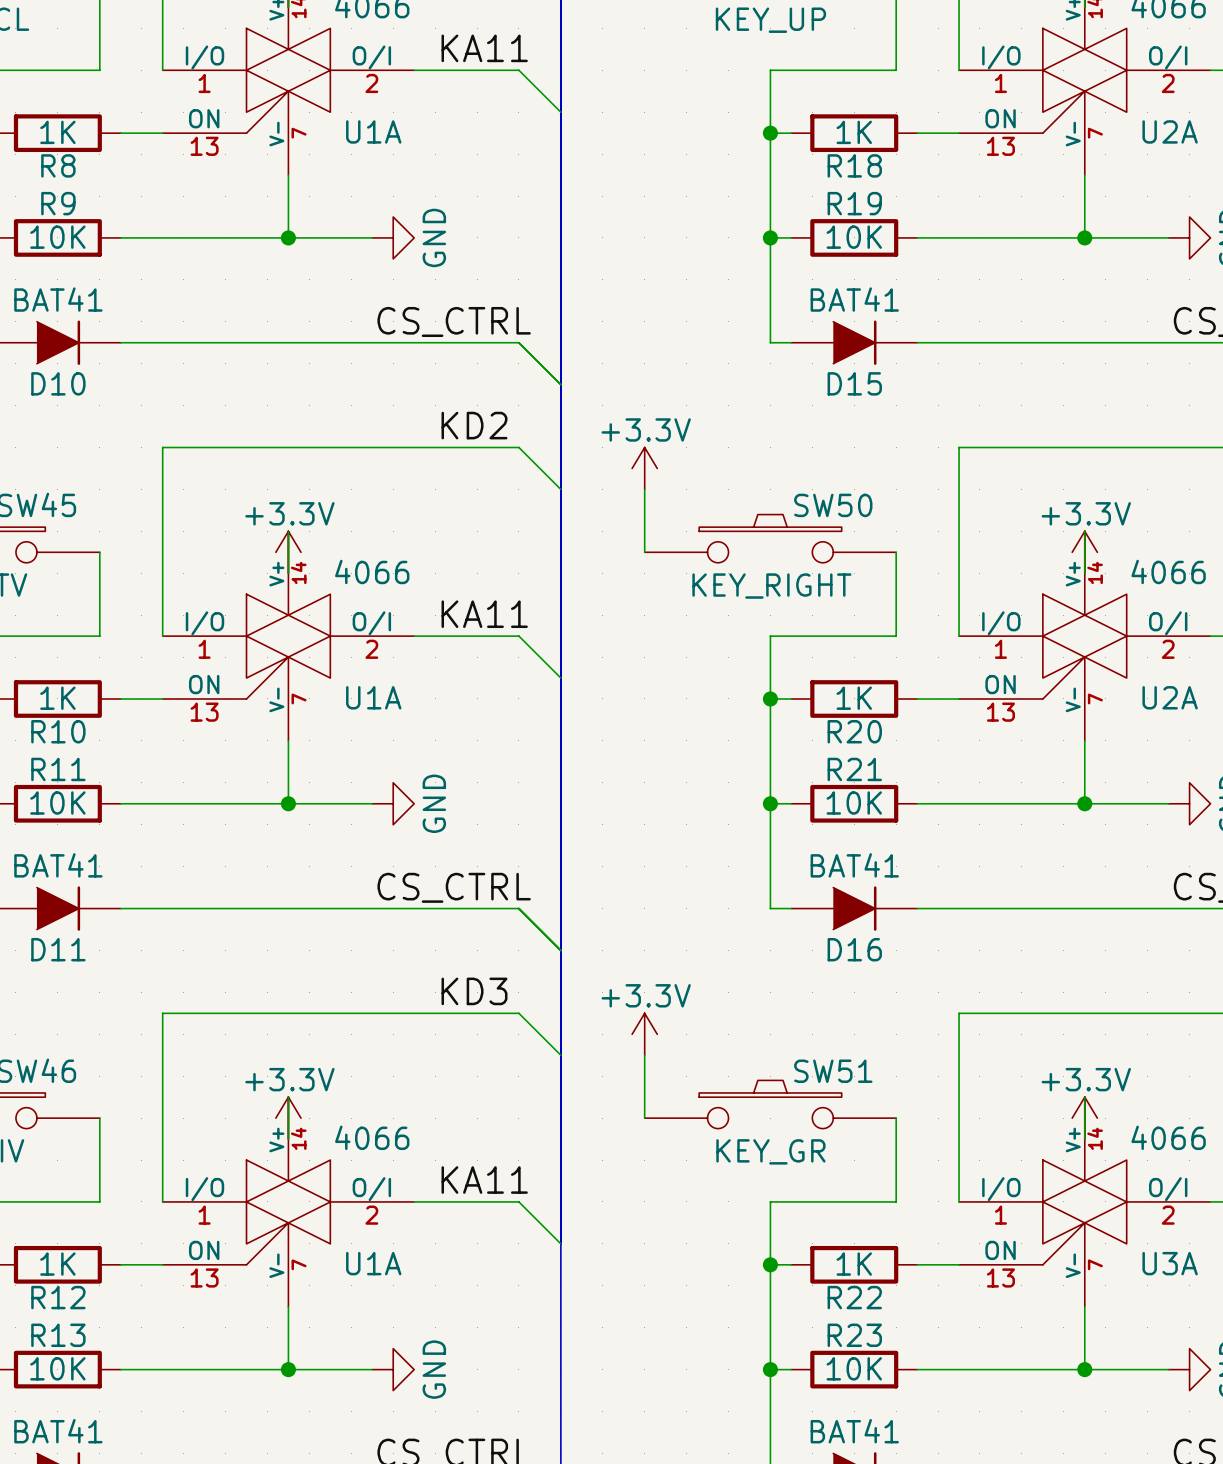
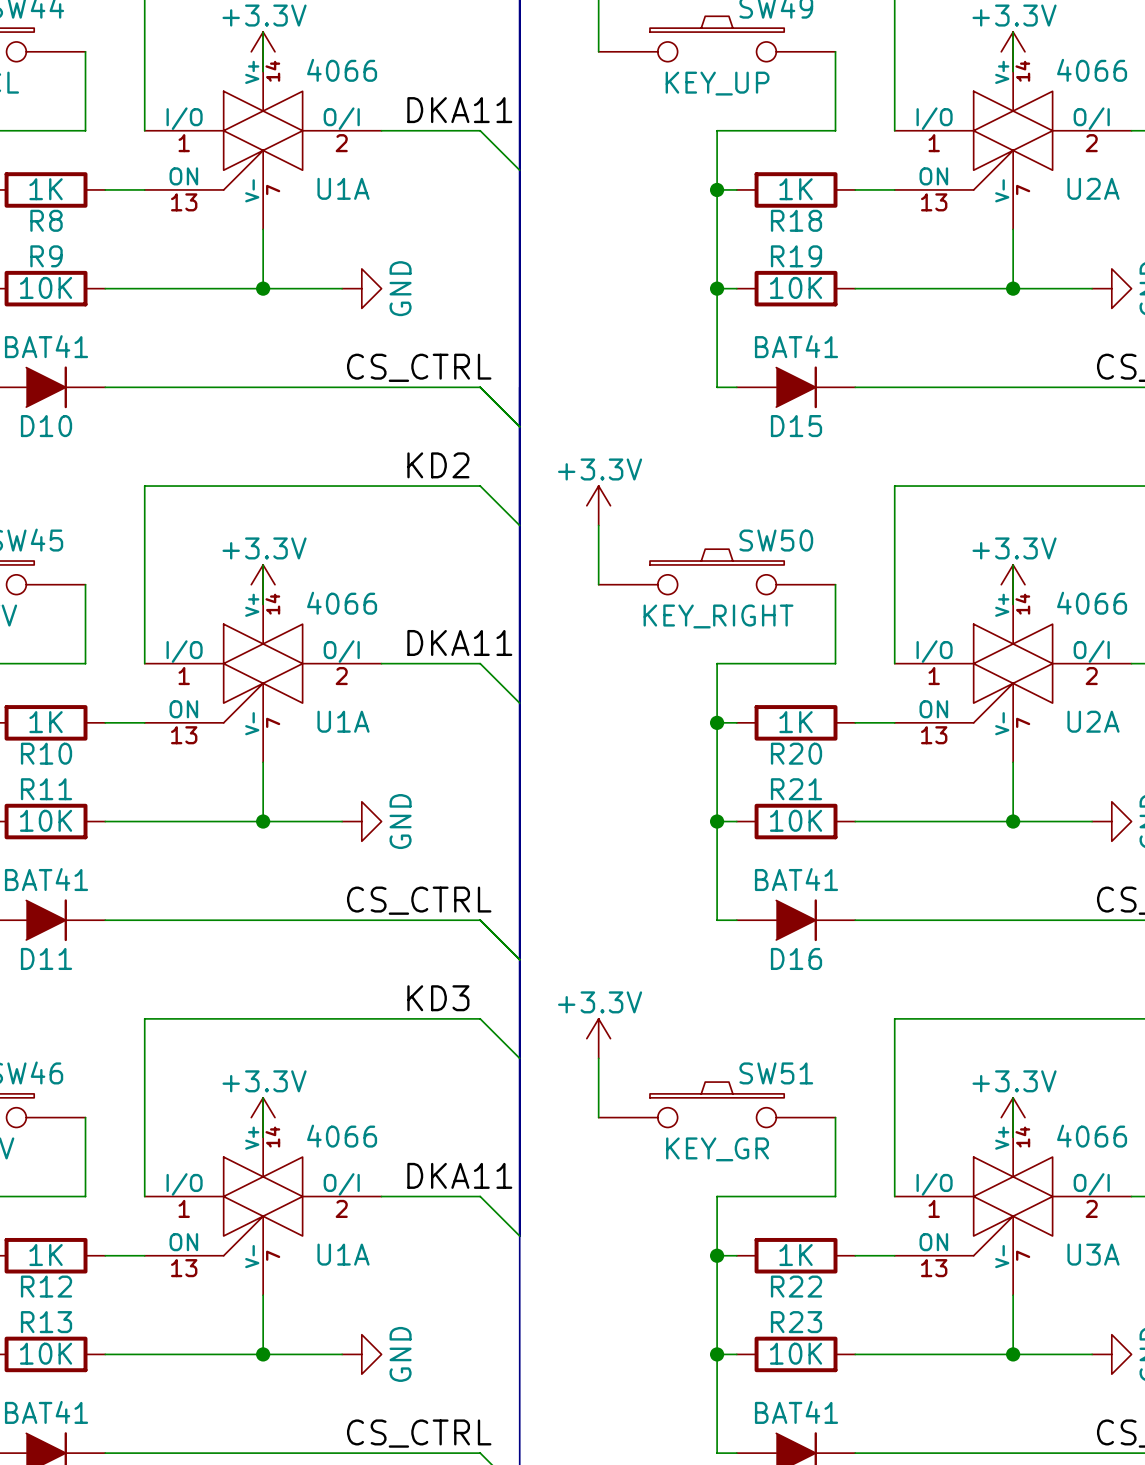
label: KA11 (484, 48) -> DKA11 (459, 110)
label: KA11 (484, 614) -> DKA11 (459, 642)
label: KA11 (484, 1180) -> DKA11 (459, 1175)

